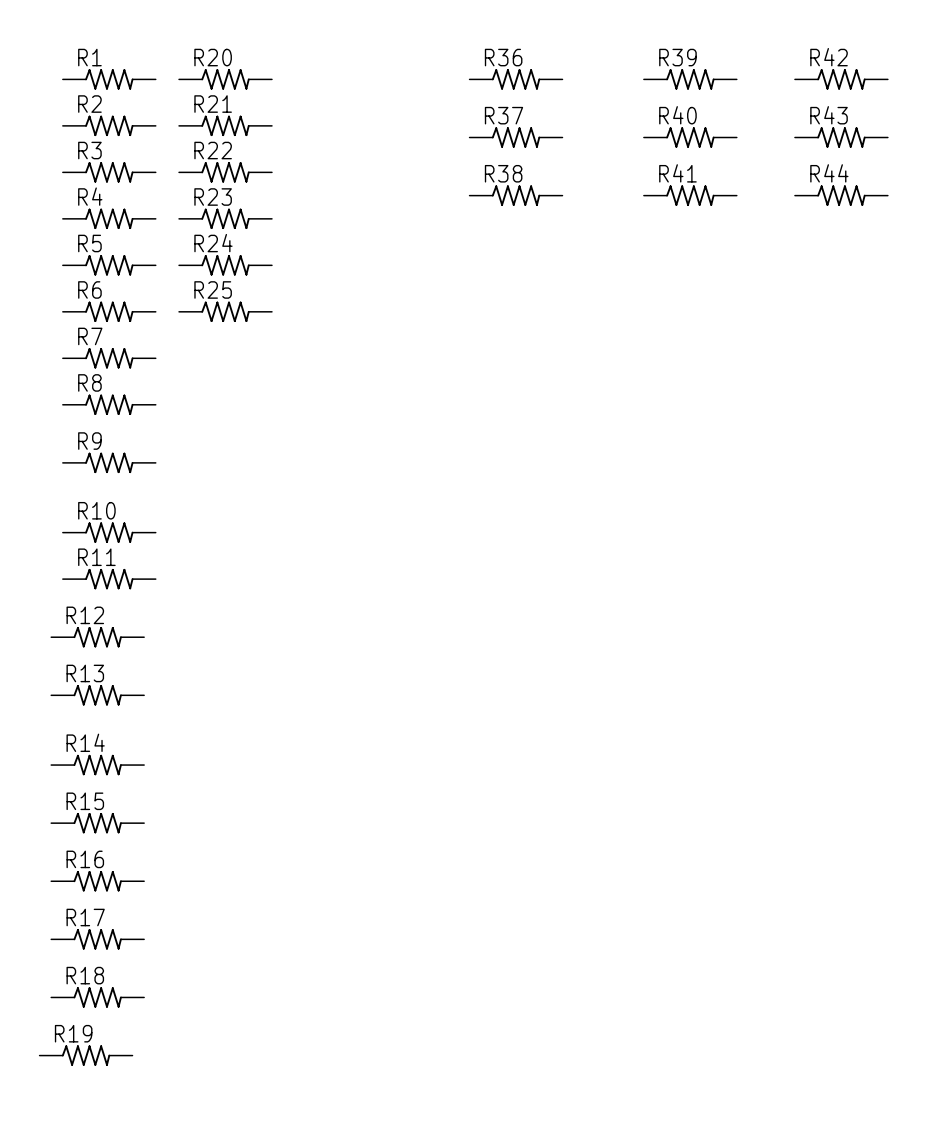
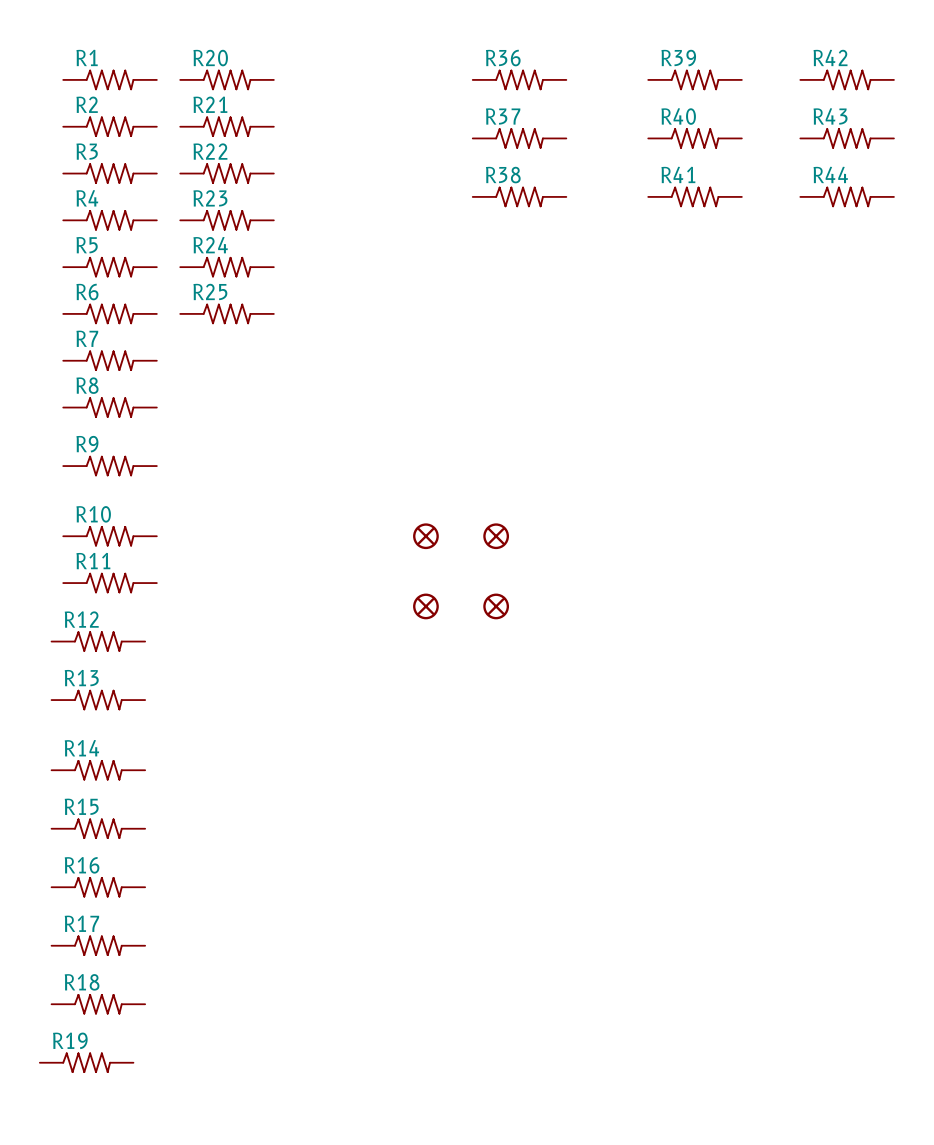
part: none -> (425, 536)
part: none -> (496, 536)
part: none -> (425, 606)
part: none -> (496, 606)

